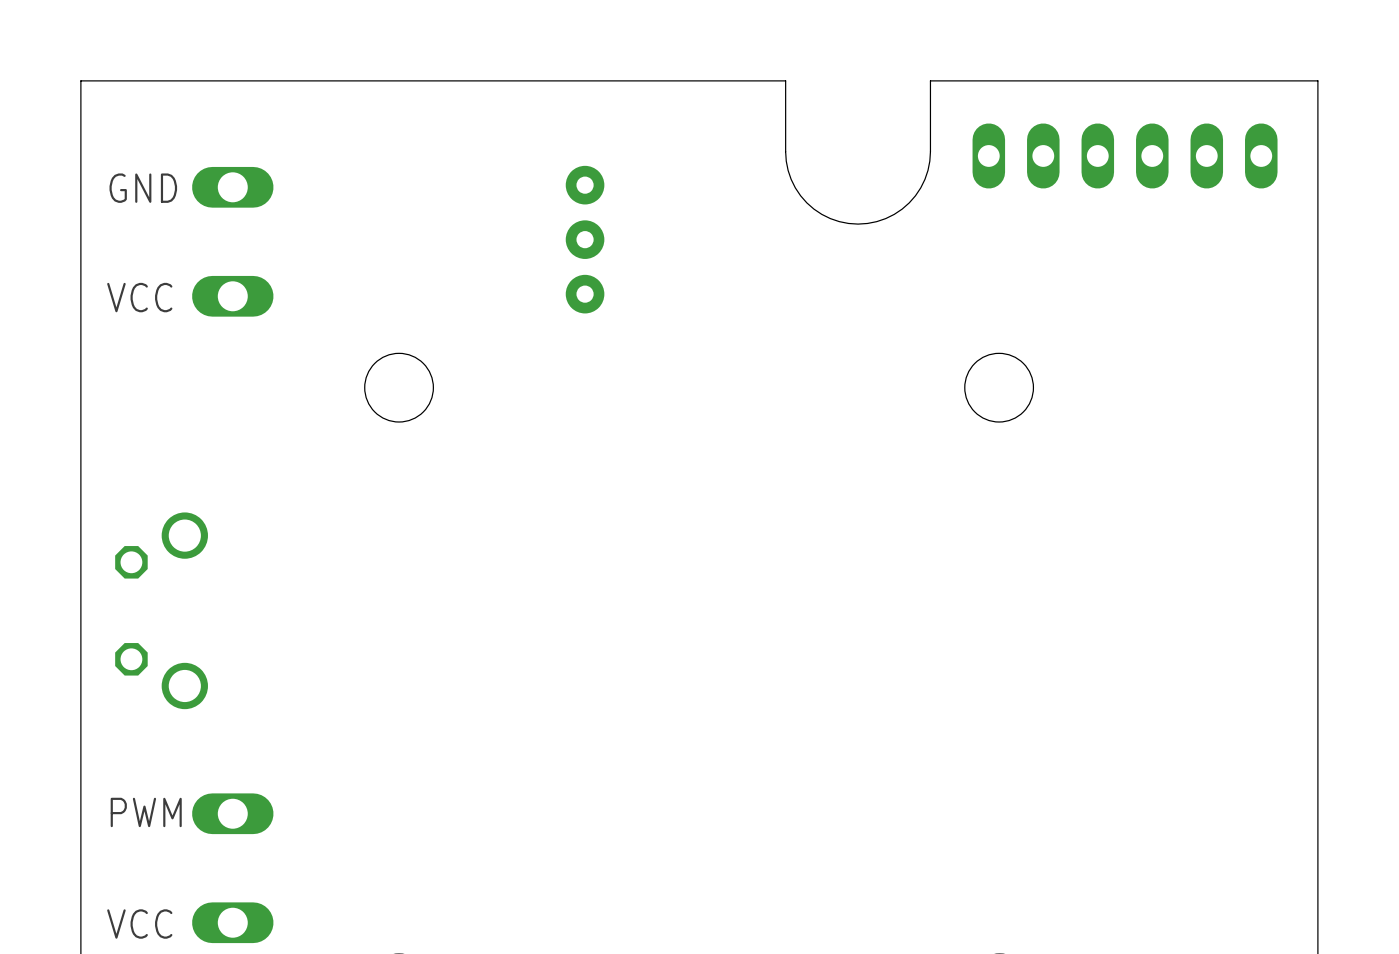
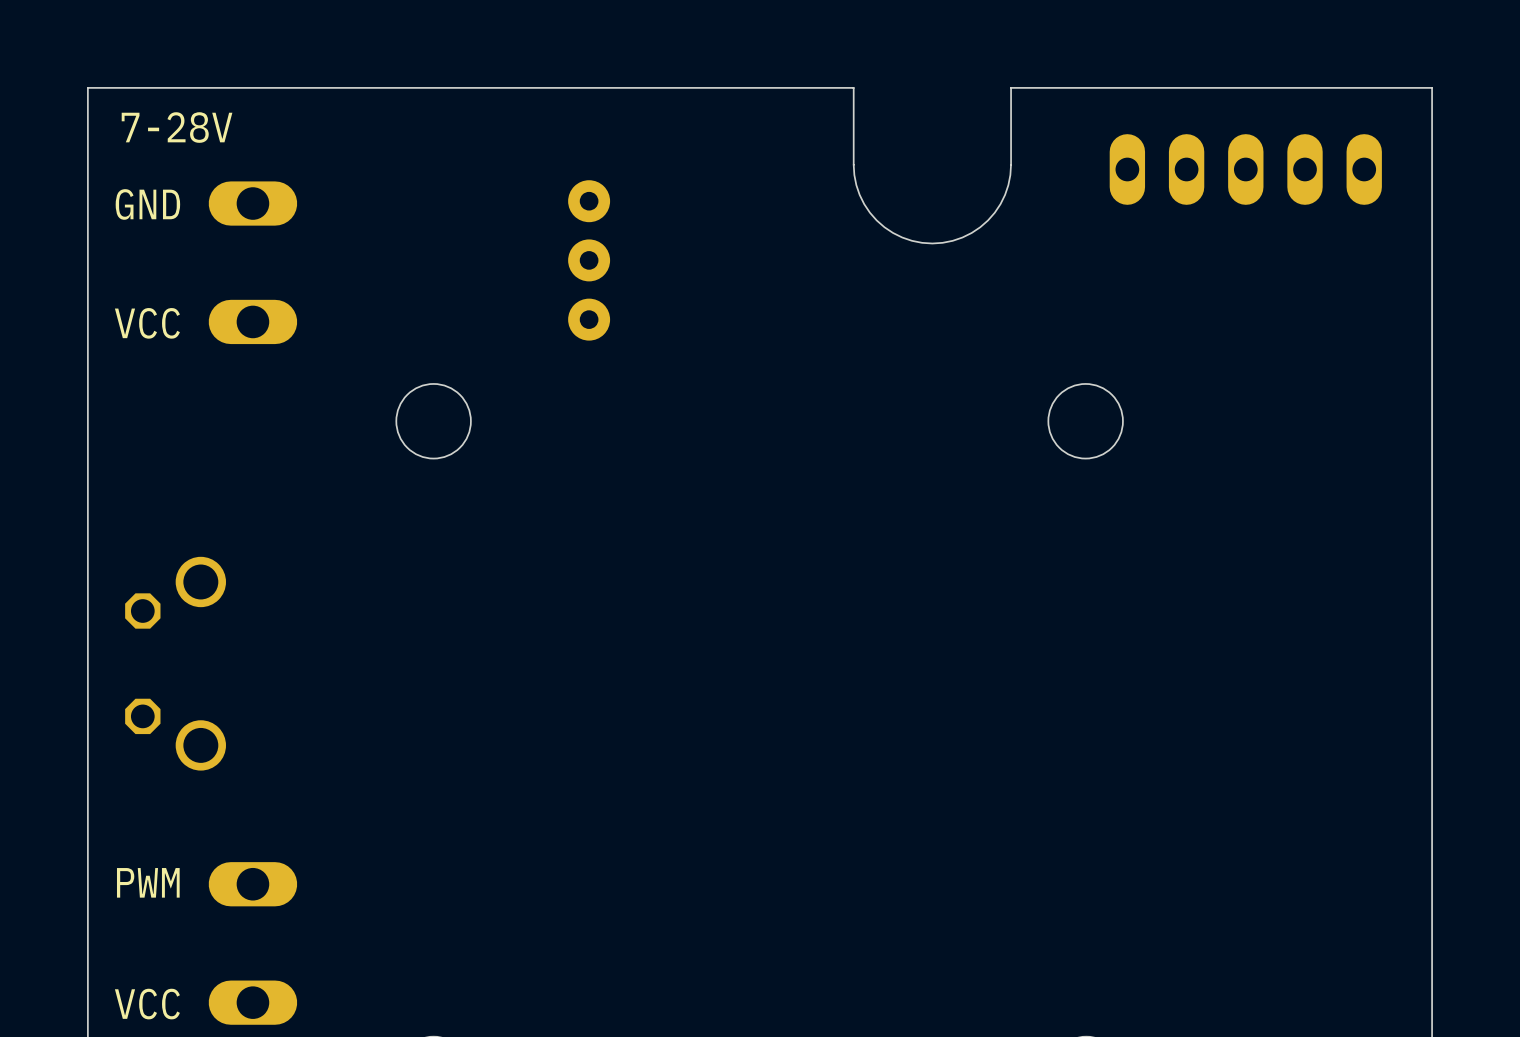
text: none -> 7-28V (177, 127)
part footprint: [972, 123, 1278, 189] -> [1109, 134, 1382, 205]
part position: (585, 239) -> (589, 260)

